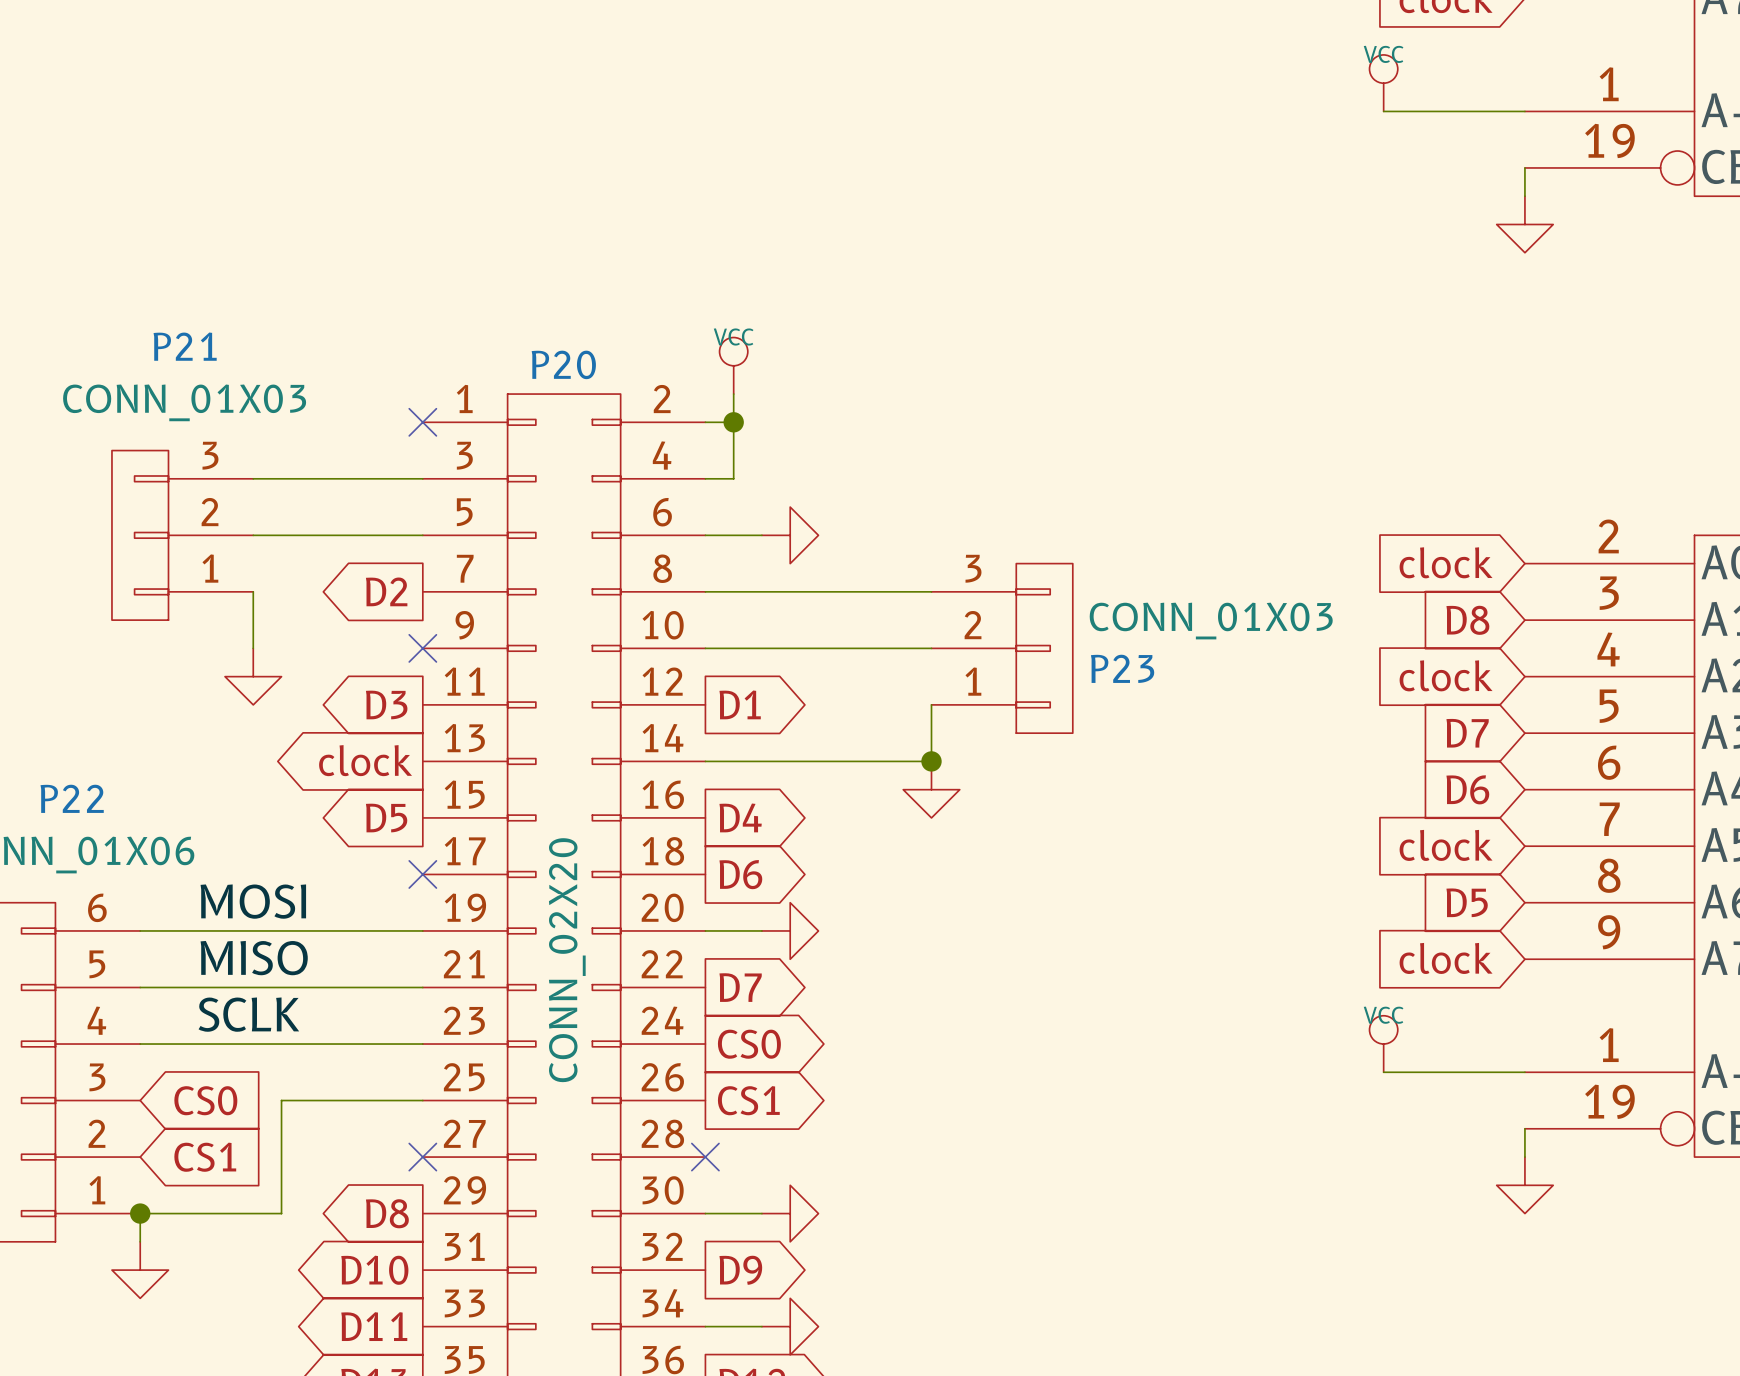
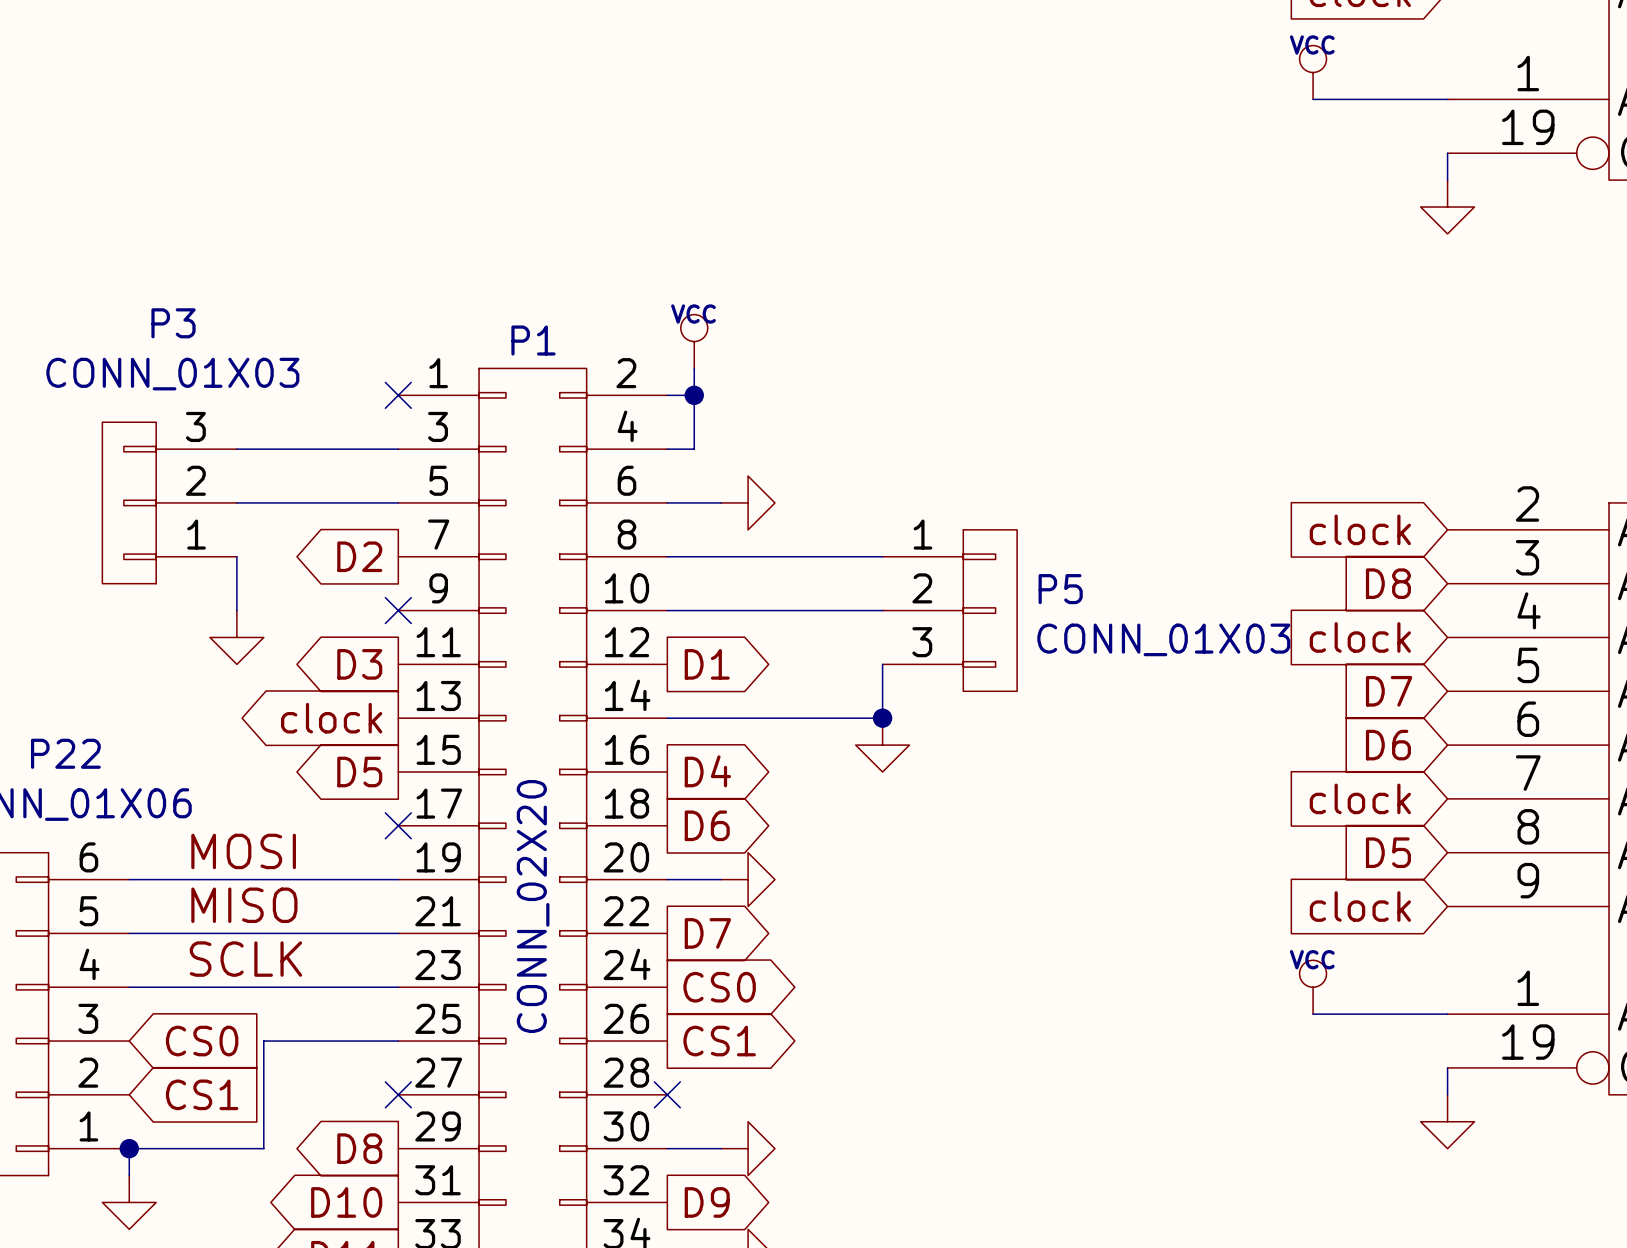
P21 name: P21 (185, 346) -> P3 (173, 323)
P20 name: P20 (563, 364) -> P1 (533, 340)
P23 flip: as is (1044, 648) -> up-down (990, 610)
P23 name: P23 (1122, 668) -> P5 (1060, 589)

